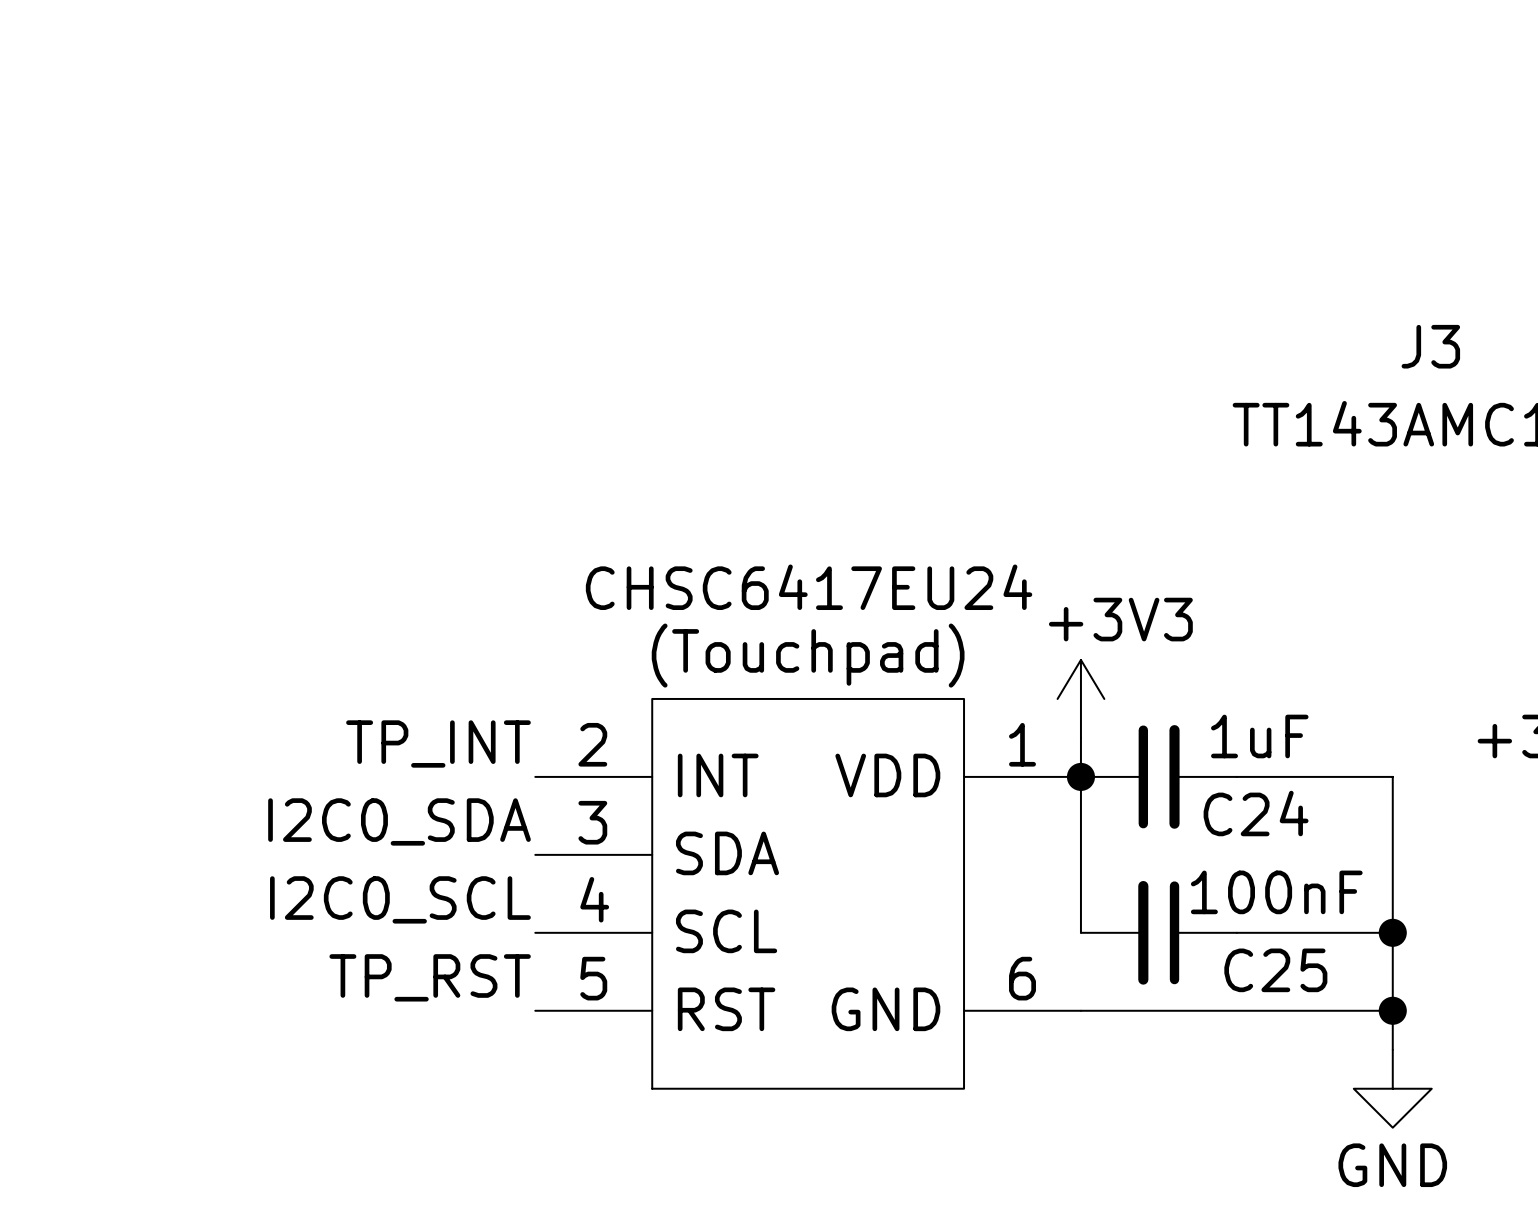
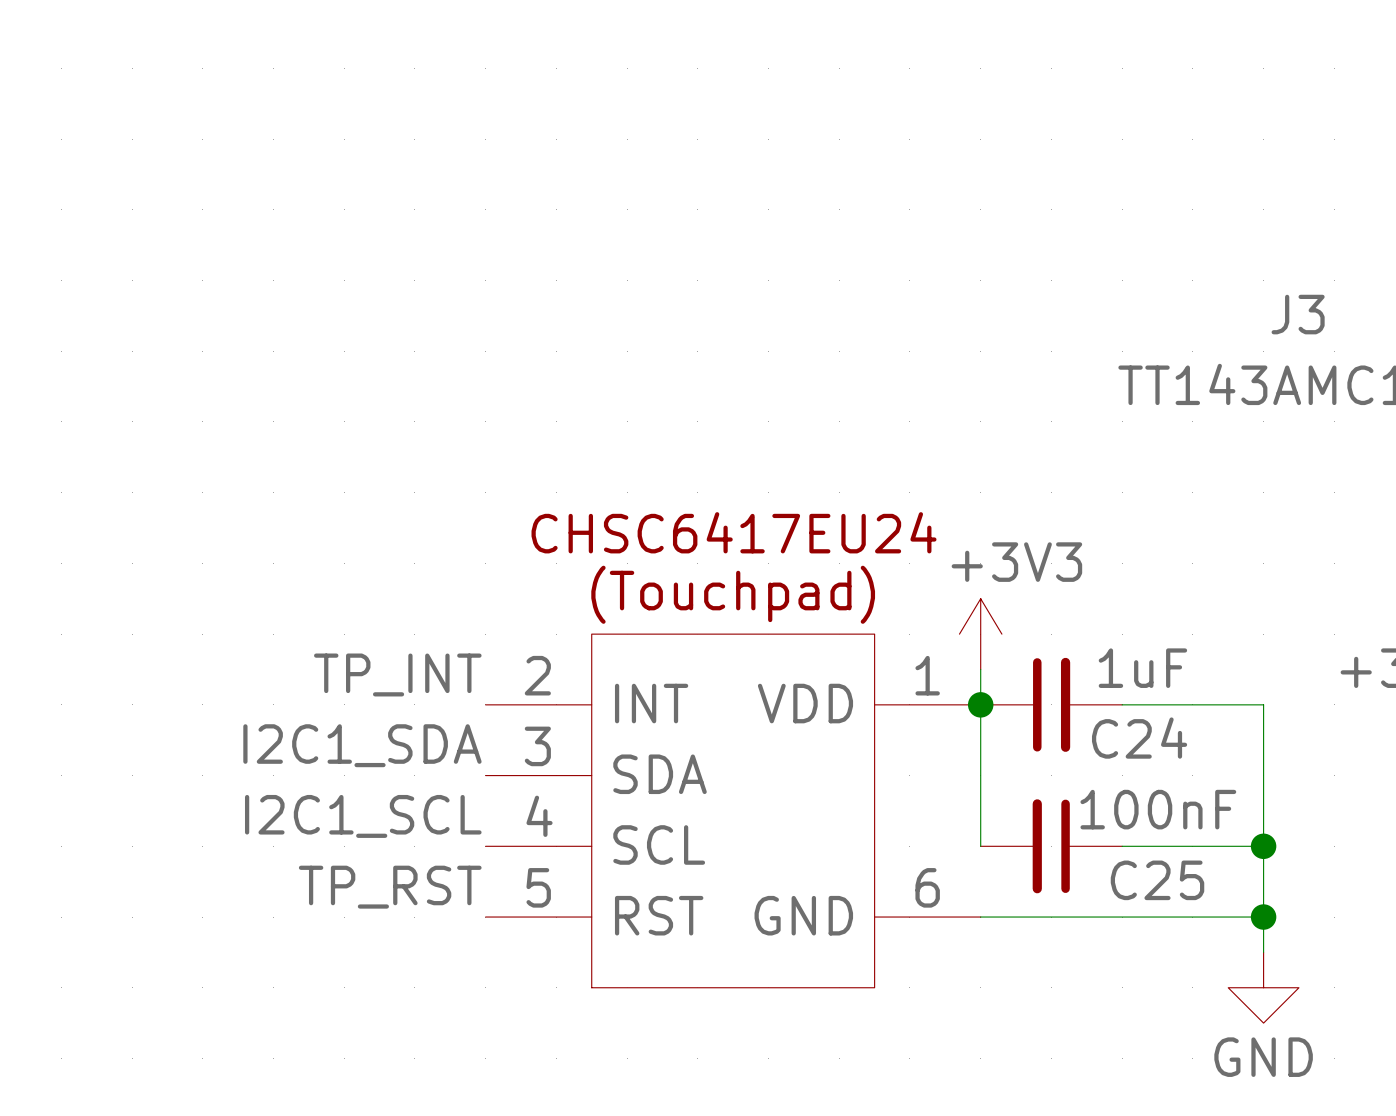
label: I2C0_SDA (399, 821) -> I2C1_SDA (362, 745)
label: I2C0_SCL (400, 899) -> I2C1_SCL (363, 816)

